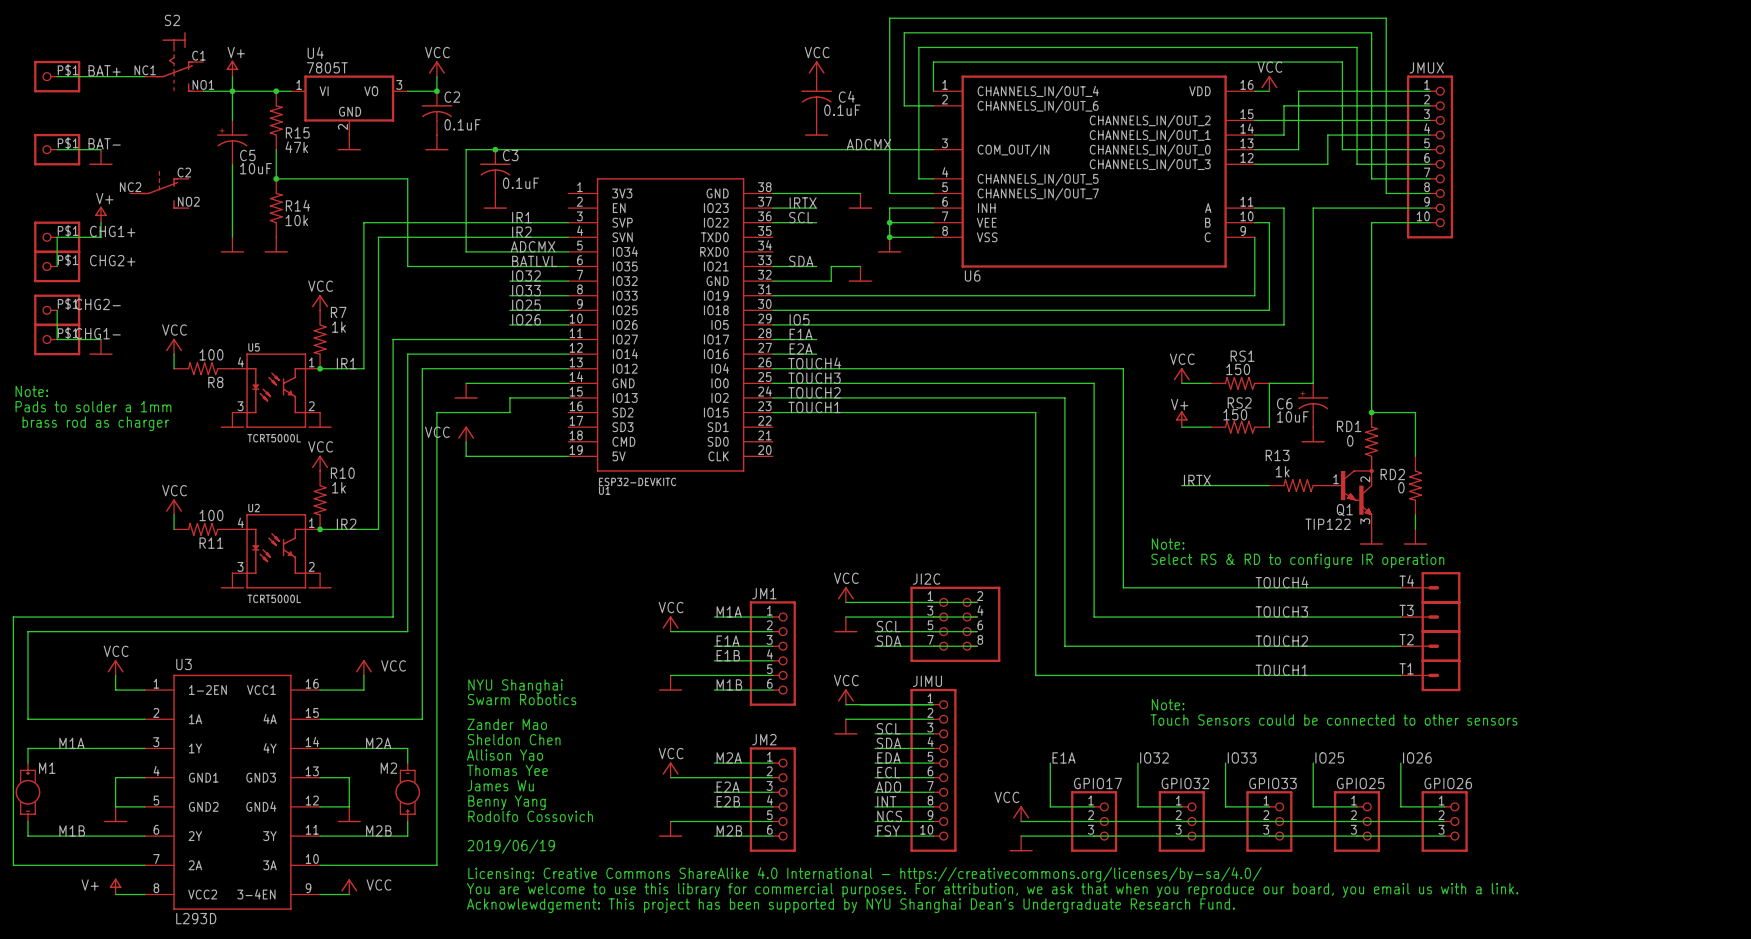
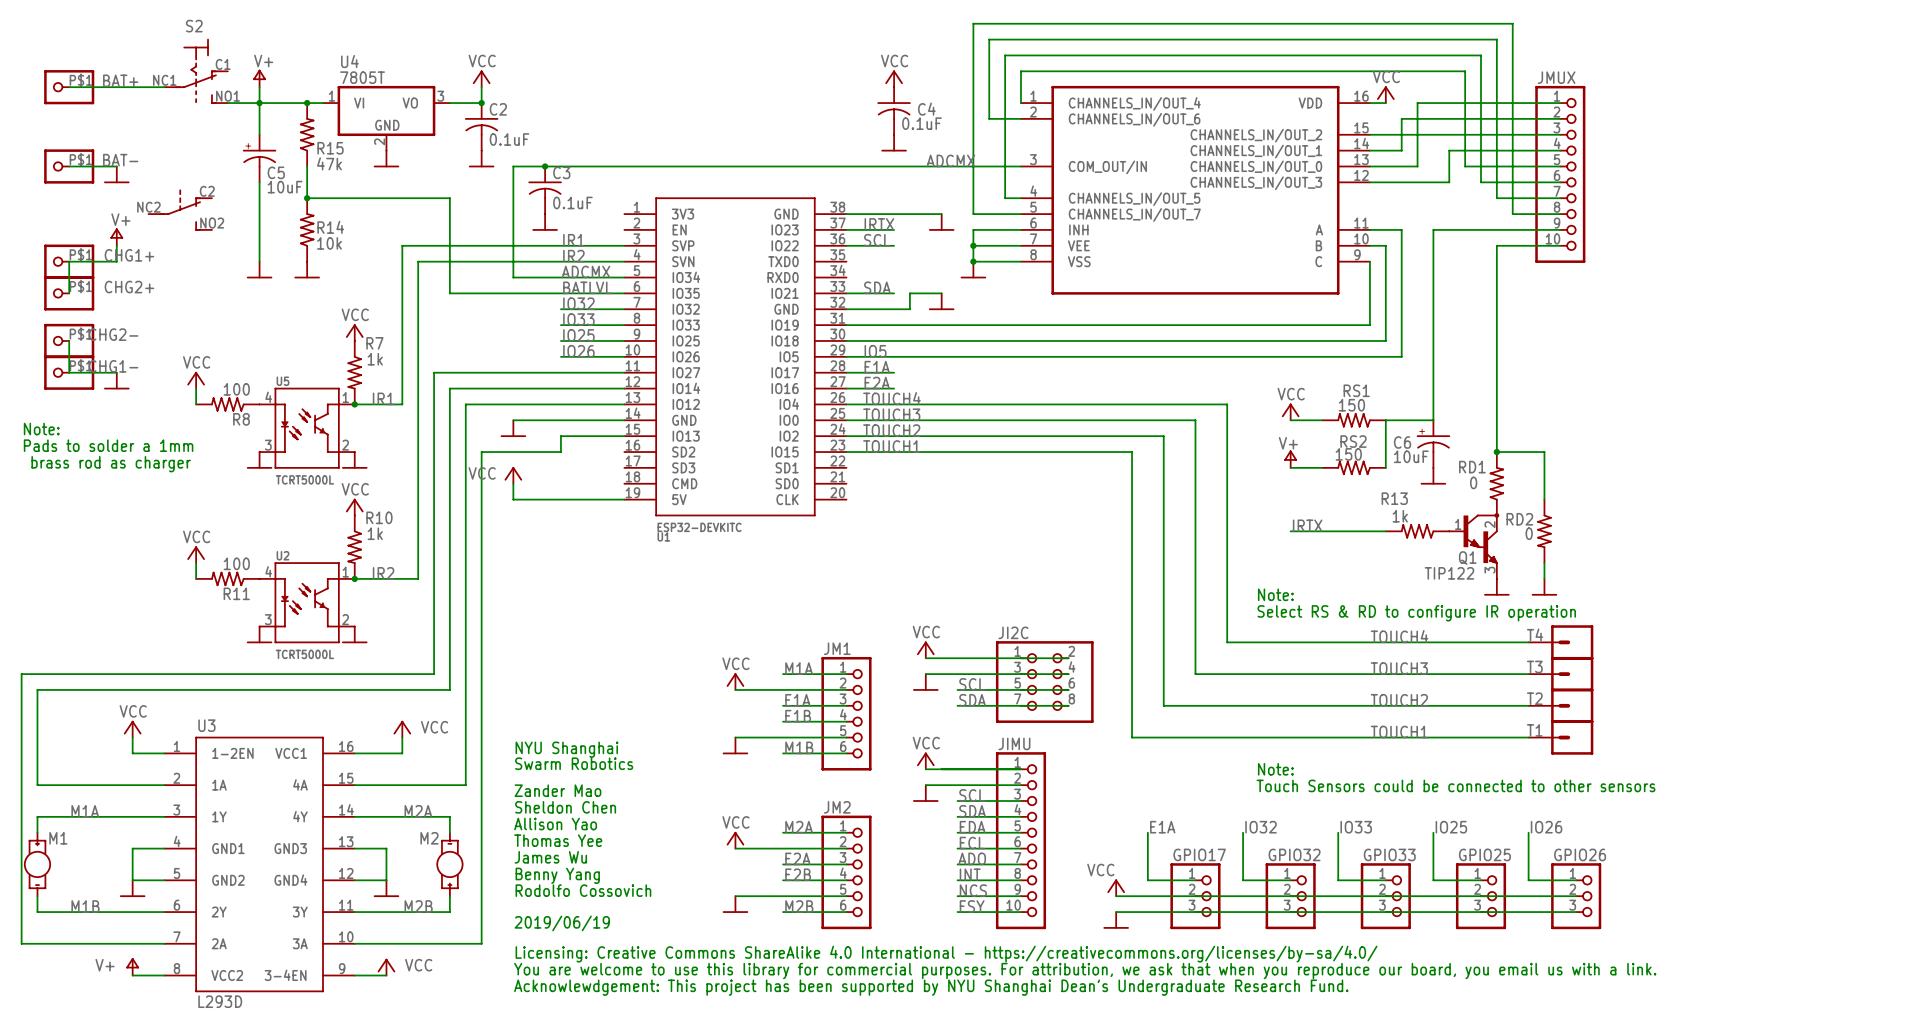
U6 name: U6 (972, 276) -> none

